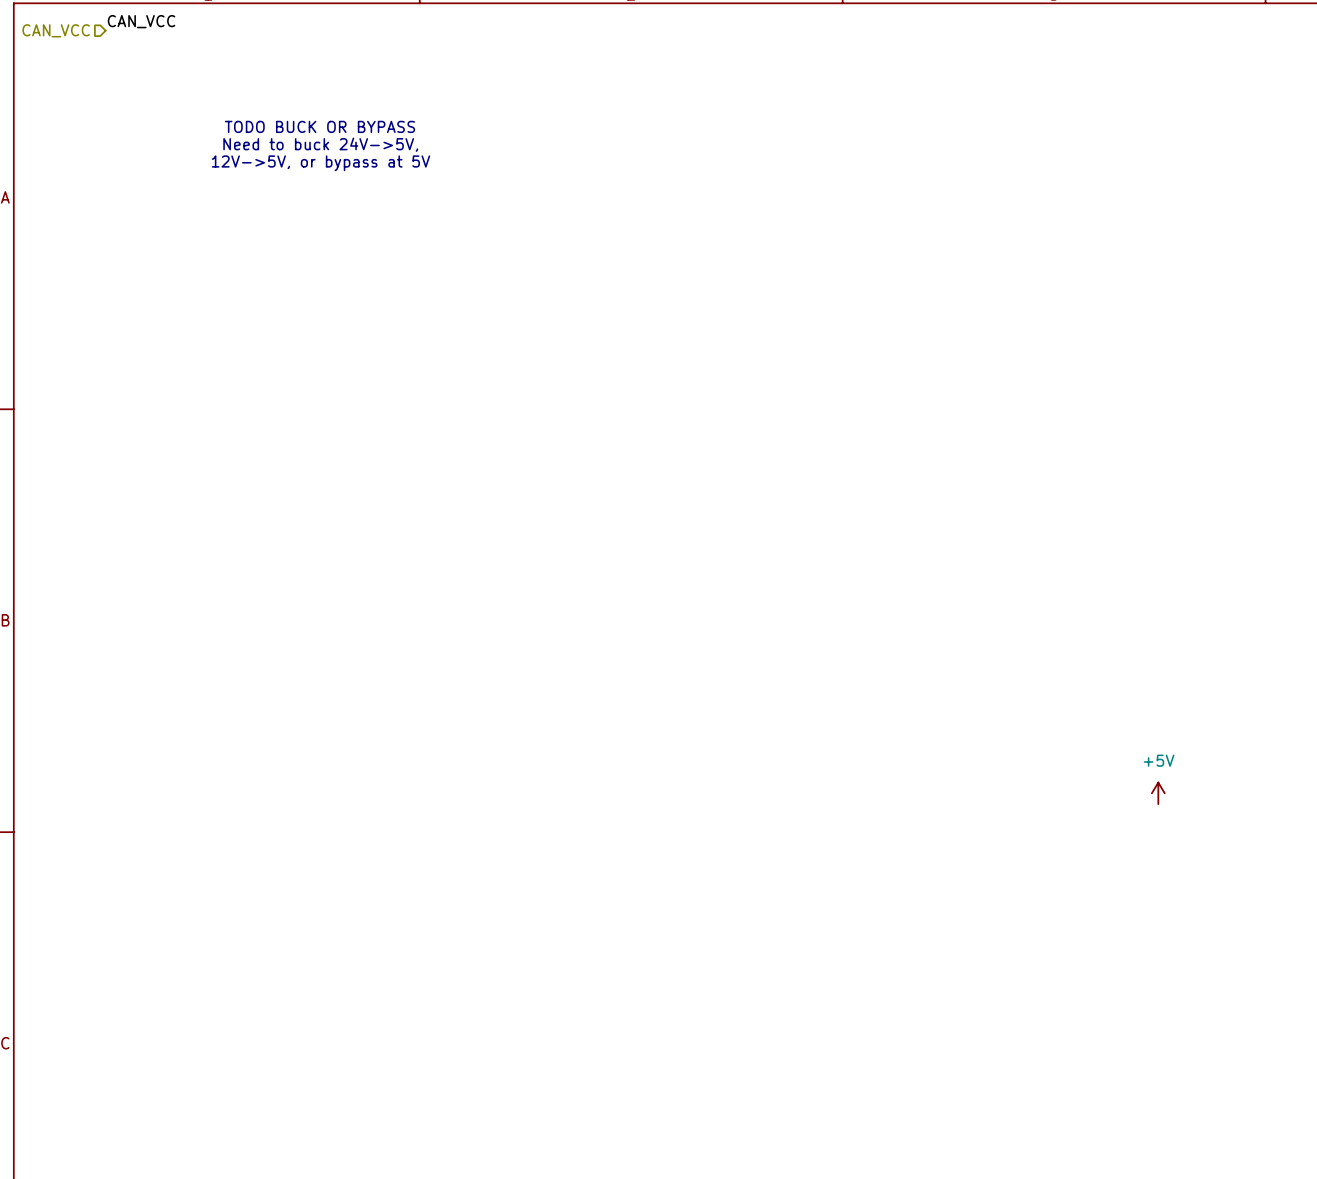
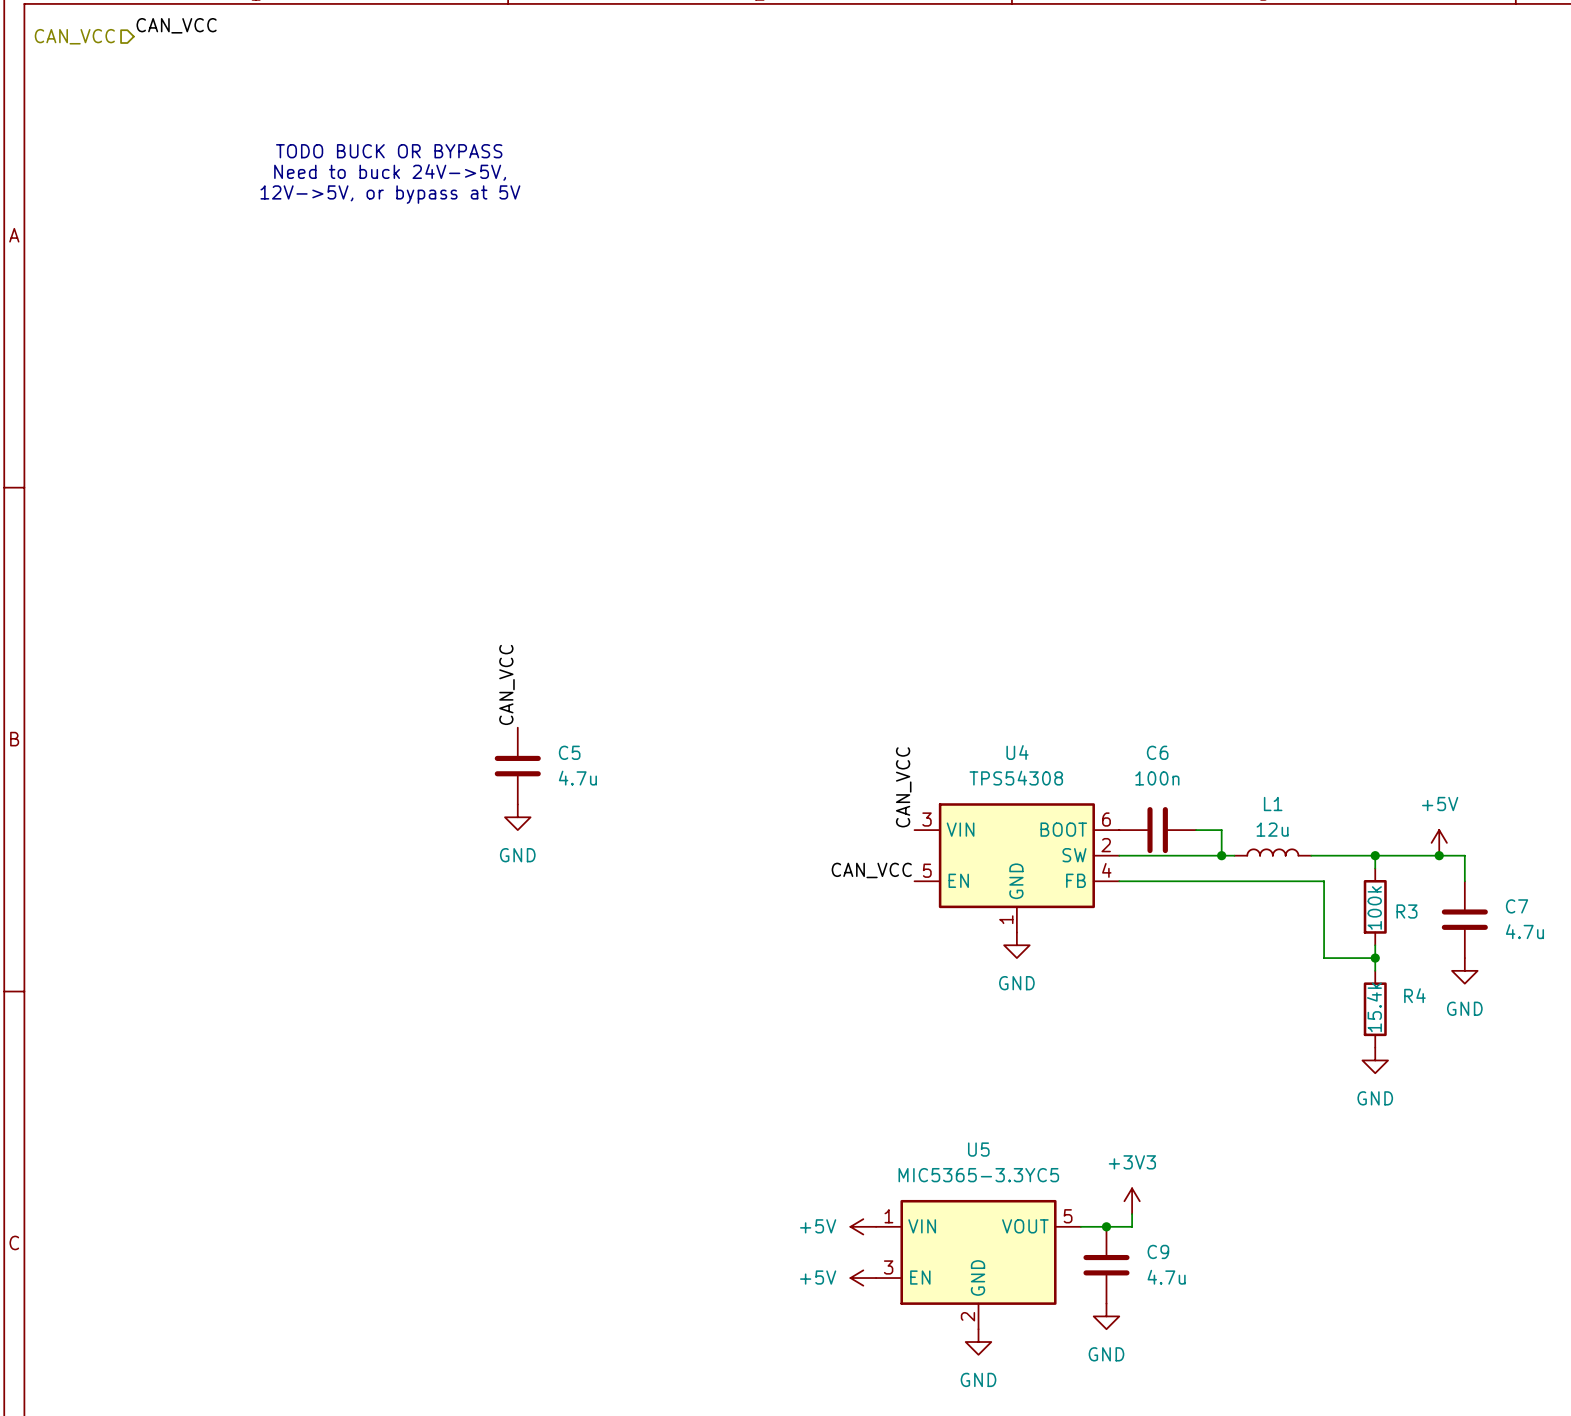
label: none -> CAN_VCC (506, 684)
C5: none -> 4.7u (517, 766)
label: none -> CAN_VCC (903, 787)
power symbol: none -> GND (517, 817)
C6: none -> 100n (1157, 830)
wire: none -> (1196, 830) (1221, 830) (1221, 855)
L1: none -> 12u (1272, 852)
wire: none -> (1119, 855) (1234, 855)
junction: none -> (1221, 855)
wire: none -> (1311, 855) (1464, 855) (1464, 881)
wire: none -> (1375, 855) (1375, 868)
junction: none -> (1375, 855)
junction: none -> (1439, 855)
U4: none -> TPS54308 (1016, 867)
label: none -> CAN_VCC (871, 870)
wire: none -> (1119, 881) (1324, 881) (1324, 958) (1375, 958)
R3: none -> 100k (1375, 906)
C7: none -> 4.7u (1464, 919)
power symbol: none -> GND (1016, 945)
wire: none -> (1375, 945) (1375, 970)
power symbol position: +5V (1158, 793) -> +5V (1439, 842)
junction: none -> (1375, 958)
power symbol: none -> GND (1464, 970)
R4: none -> 15.4k (1375, 1009)
power symbol: none -> GND (1375, 1060)
power symbol: none -> +3V3 (1132, 1201)
wire: none -> (1132, 1214) (1132, 1226) (1080, 1226)
power symbol: none -> +5V (863, 1226)
junction: none -> (1106, 1226)
U5: none -> MIC5365-3.3YC5 (978, 1264)
C9: none -> 4.7u (1106, 1265)
power symbol: none -> +5V (863, 1278)
power symbol: none -> GND (1106, 1316)
power symbol: none -> GND (978, 1342)

